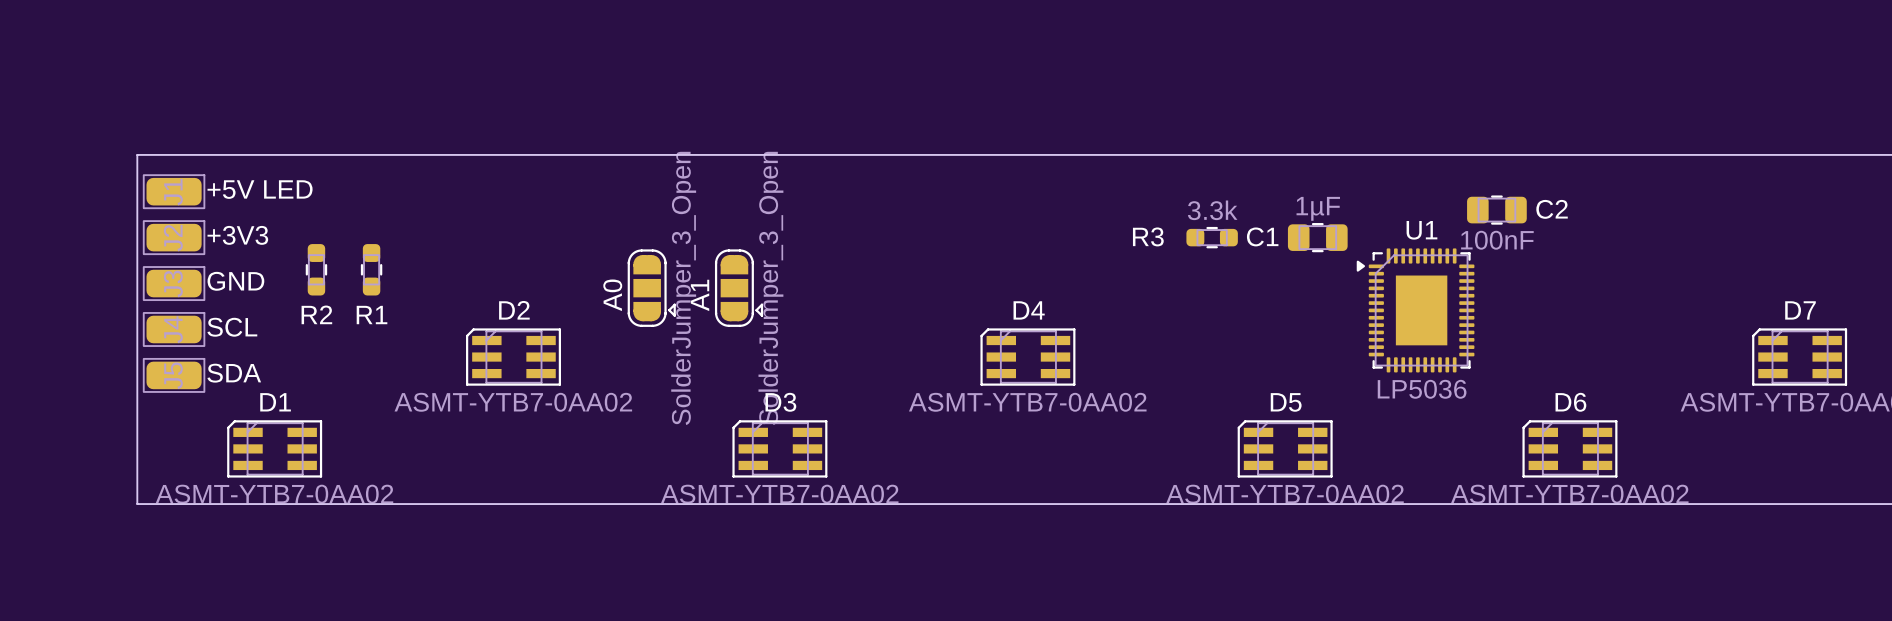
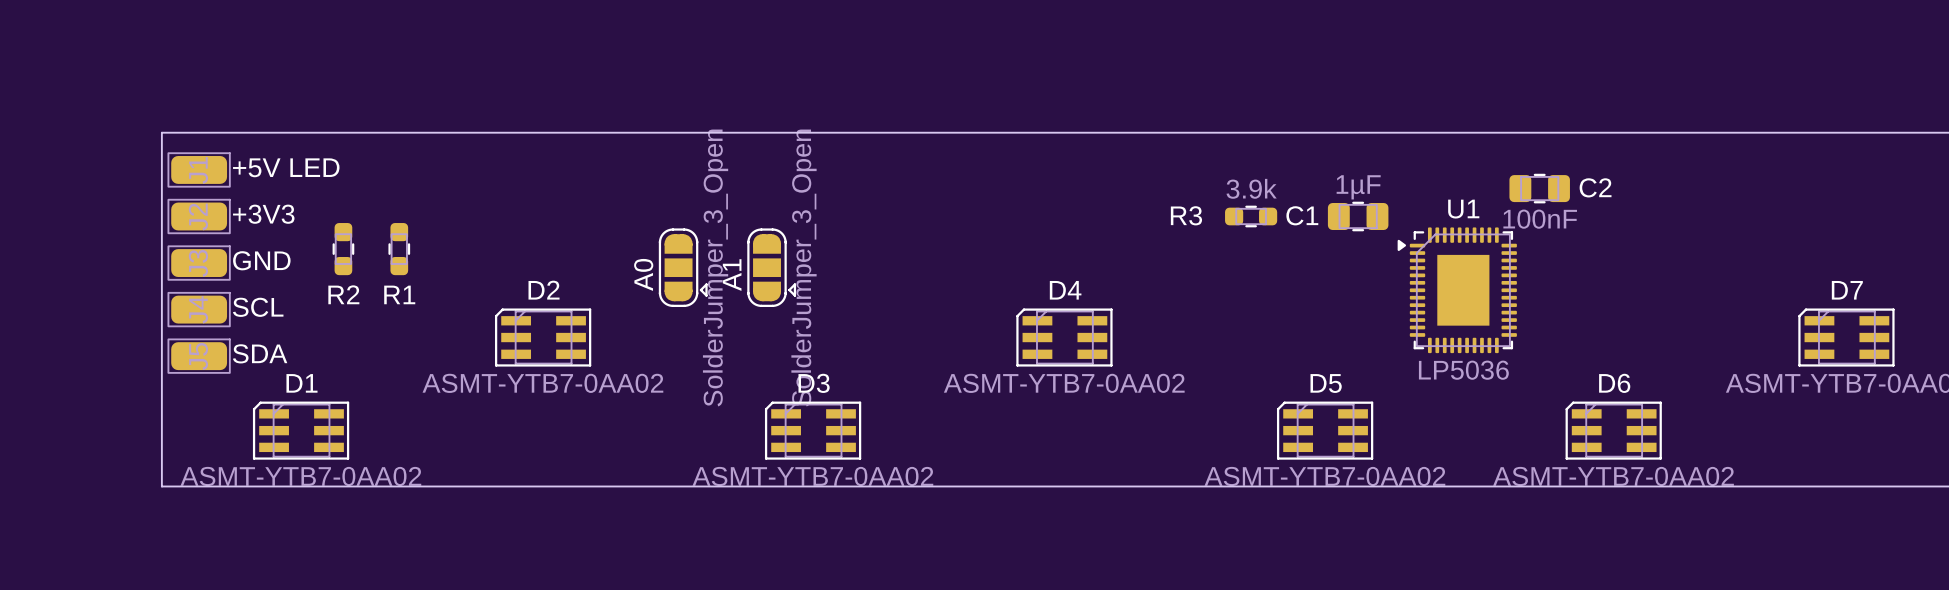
R3 value: 3.3k (1212, 210) -> 3.9k (1251, 188)

